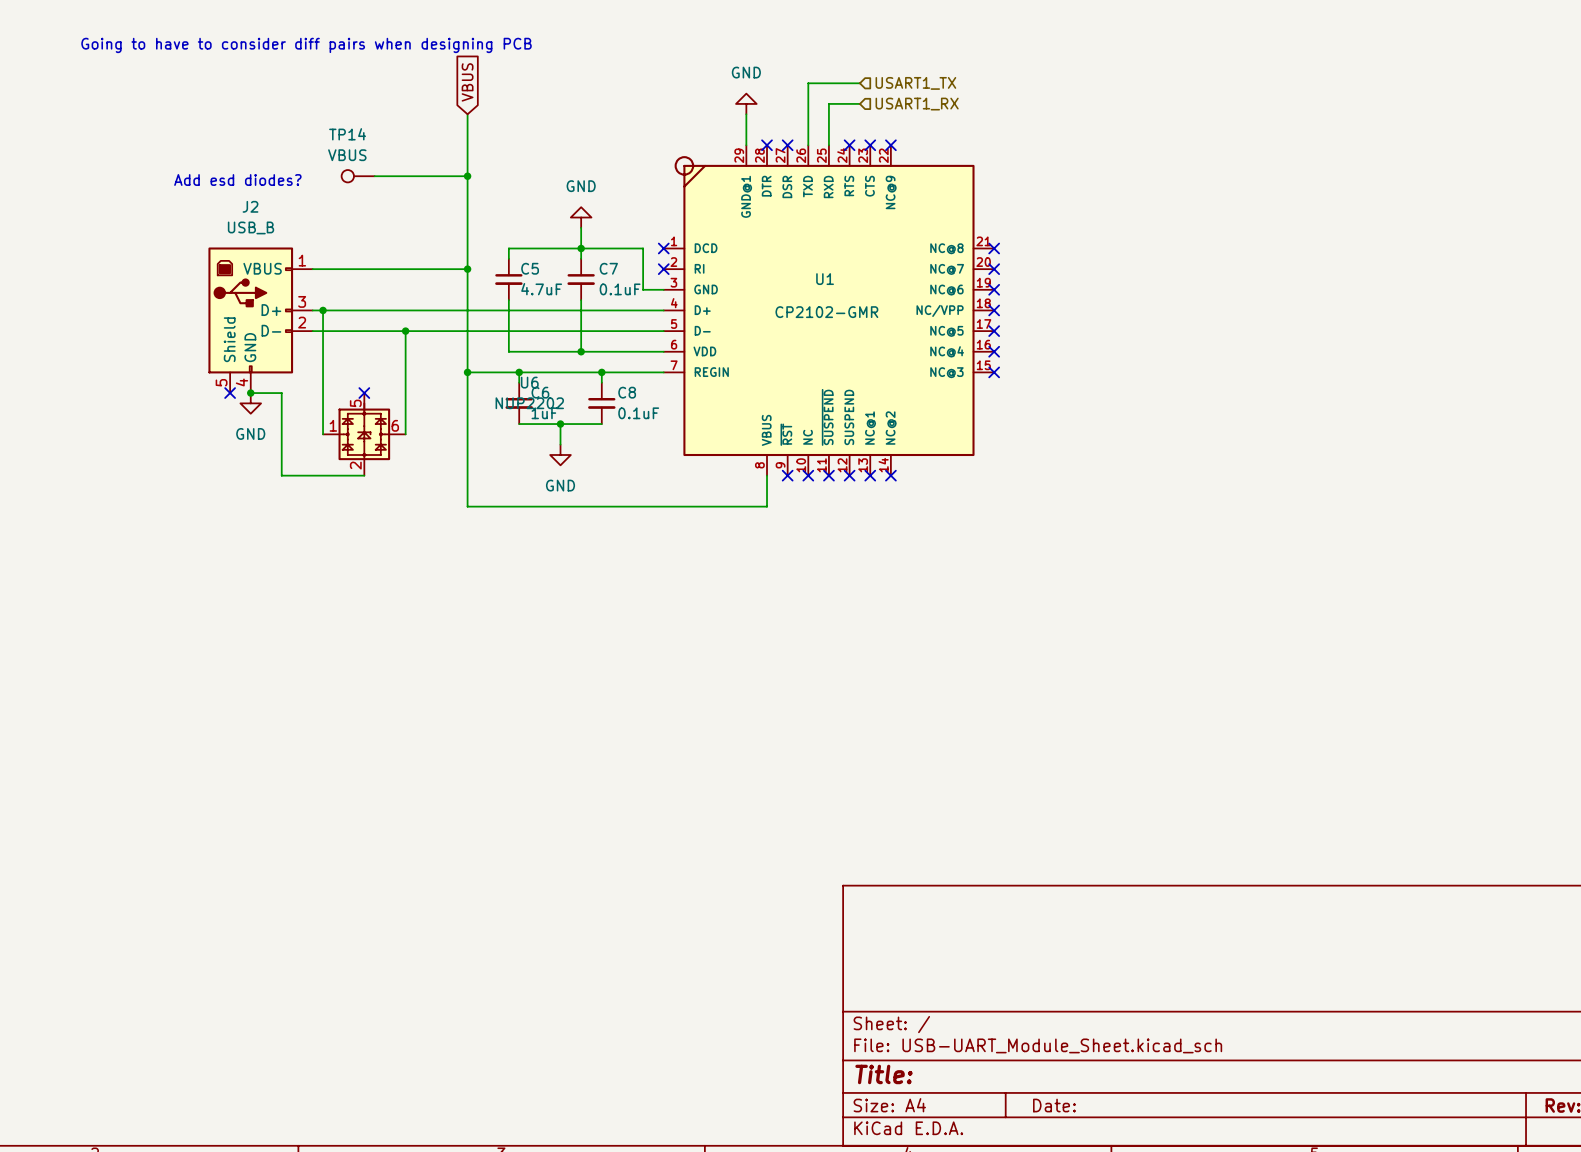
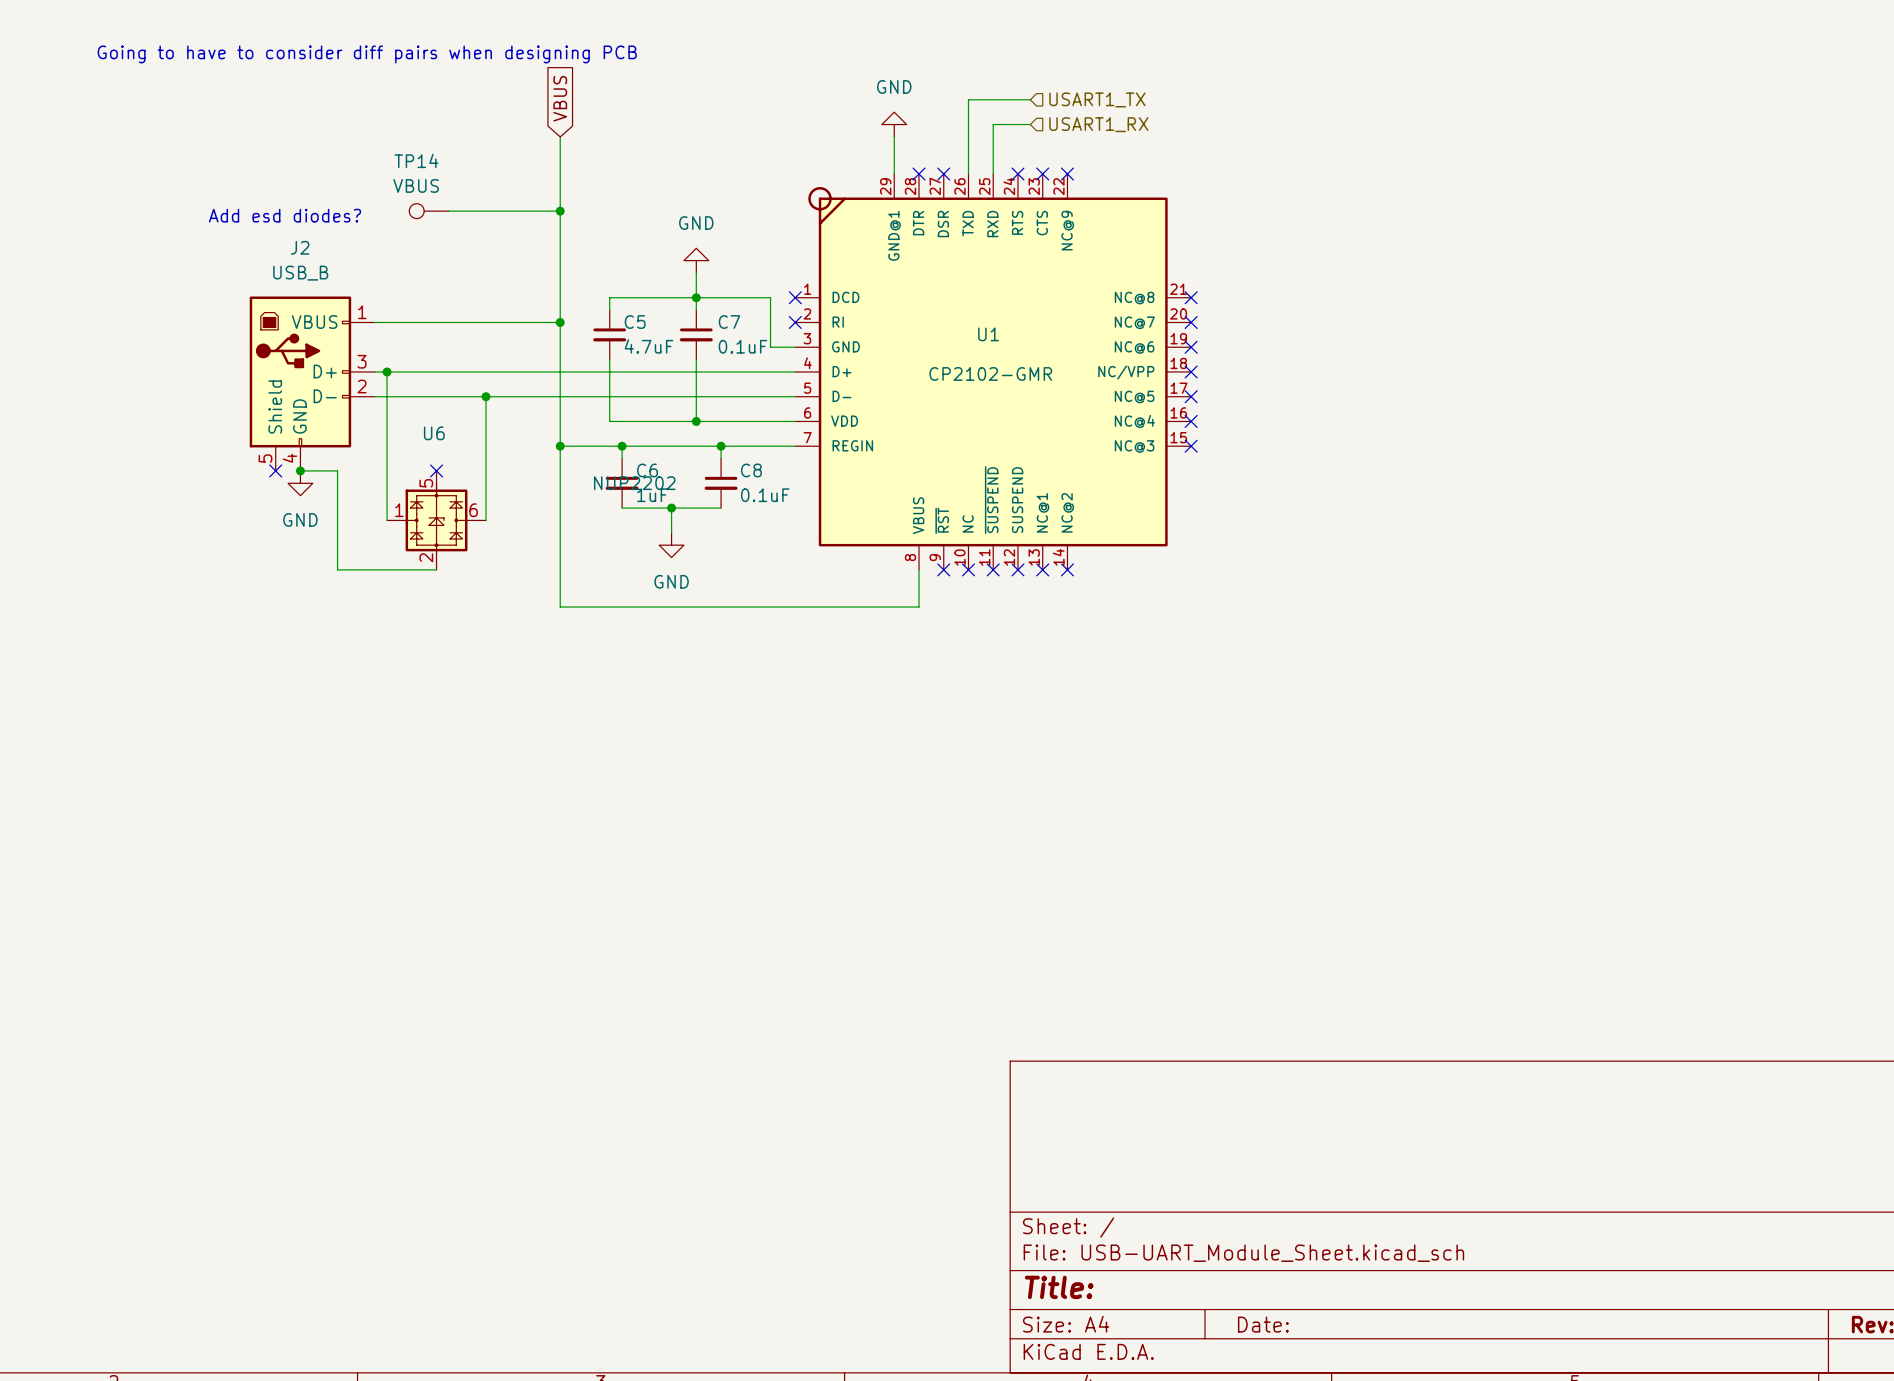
U6 name position: U6 (529, 382) -> U6 (434, 433)

